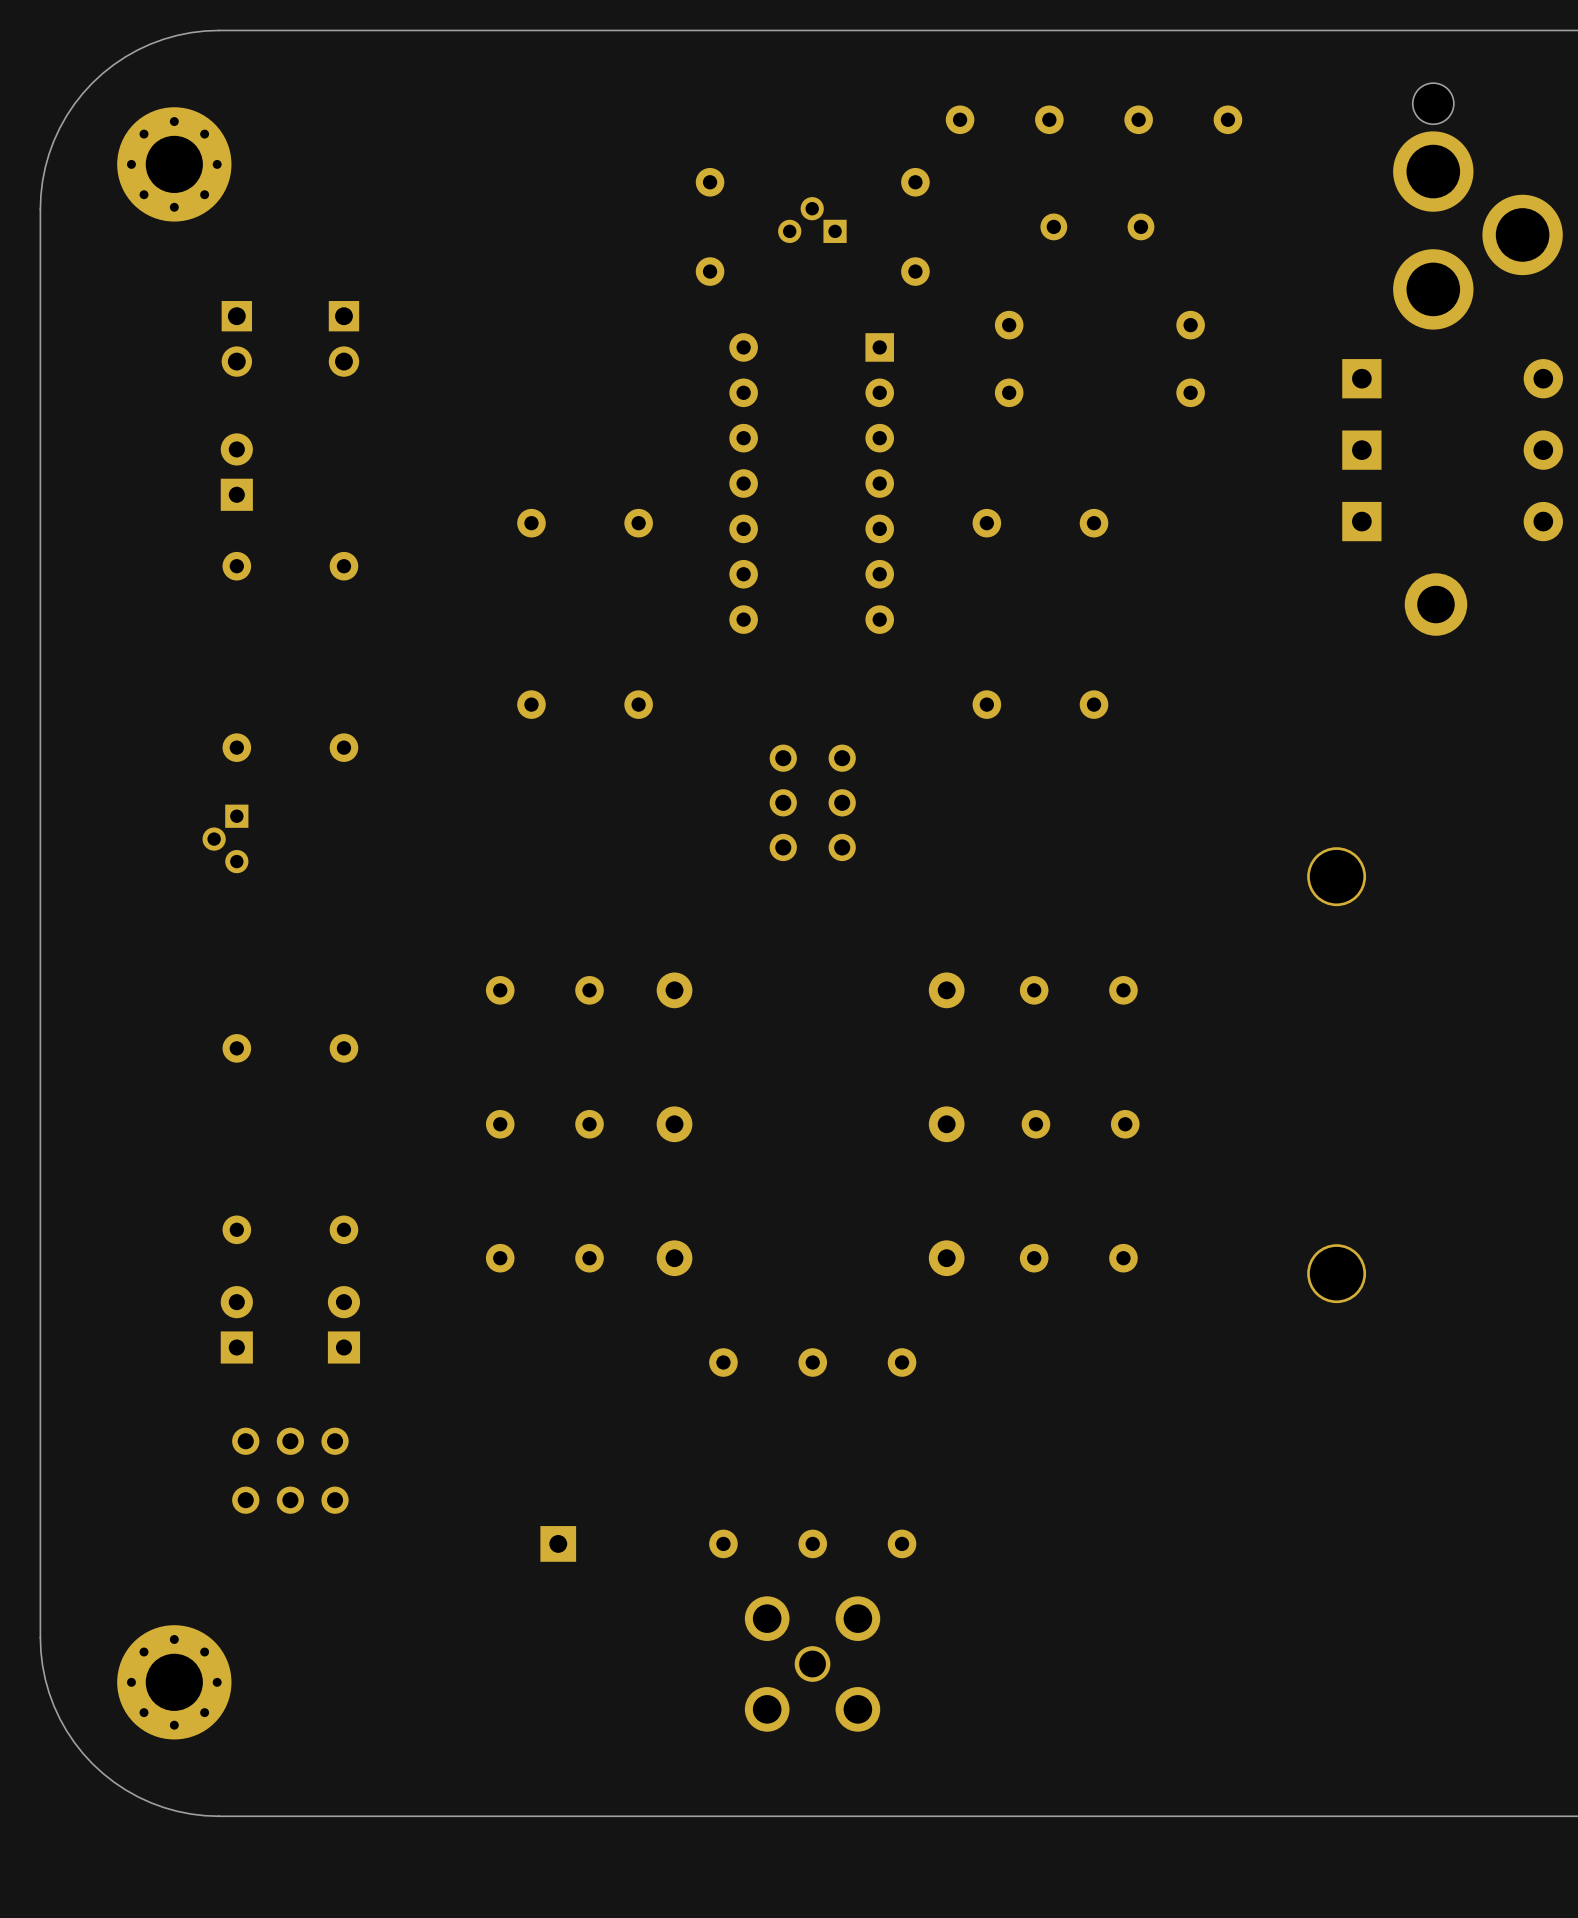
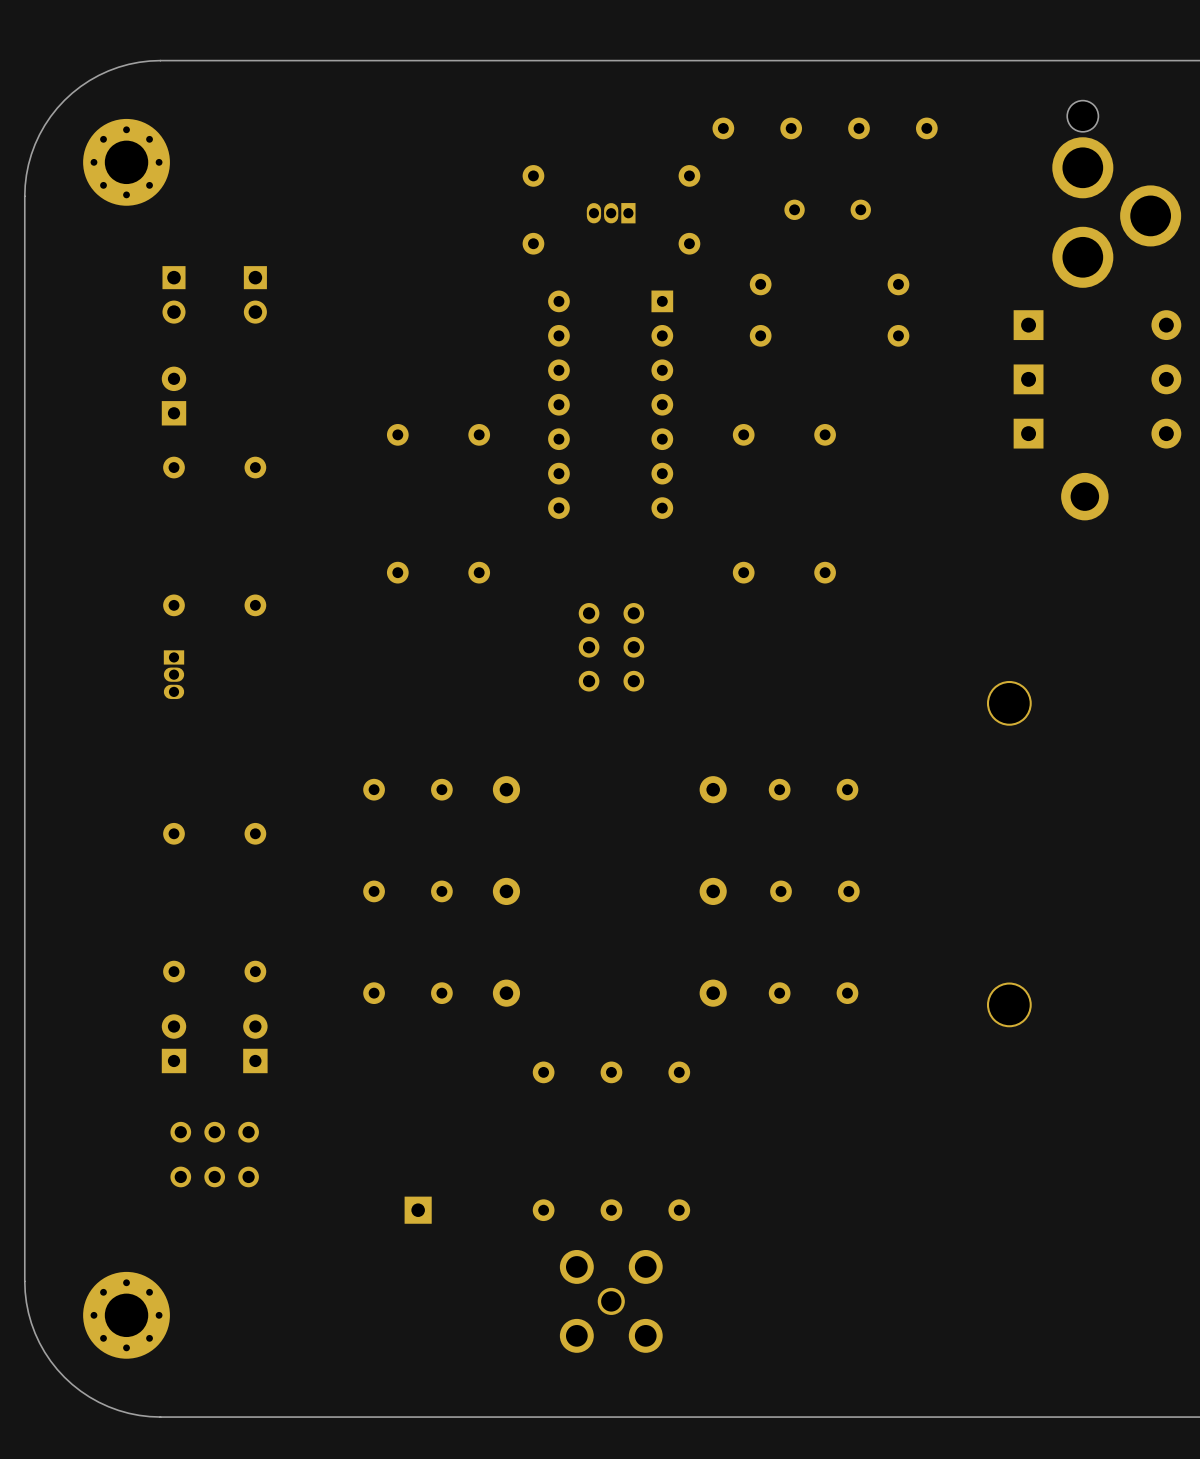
part footprint: [778, 197, 847, 243] -> [586, 203, 636, 224]
part footprint: [202, 804, 249, 874] -> [163, 650, 185, 700]

